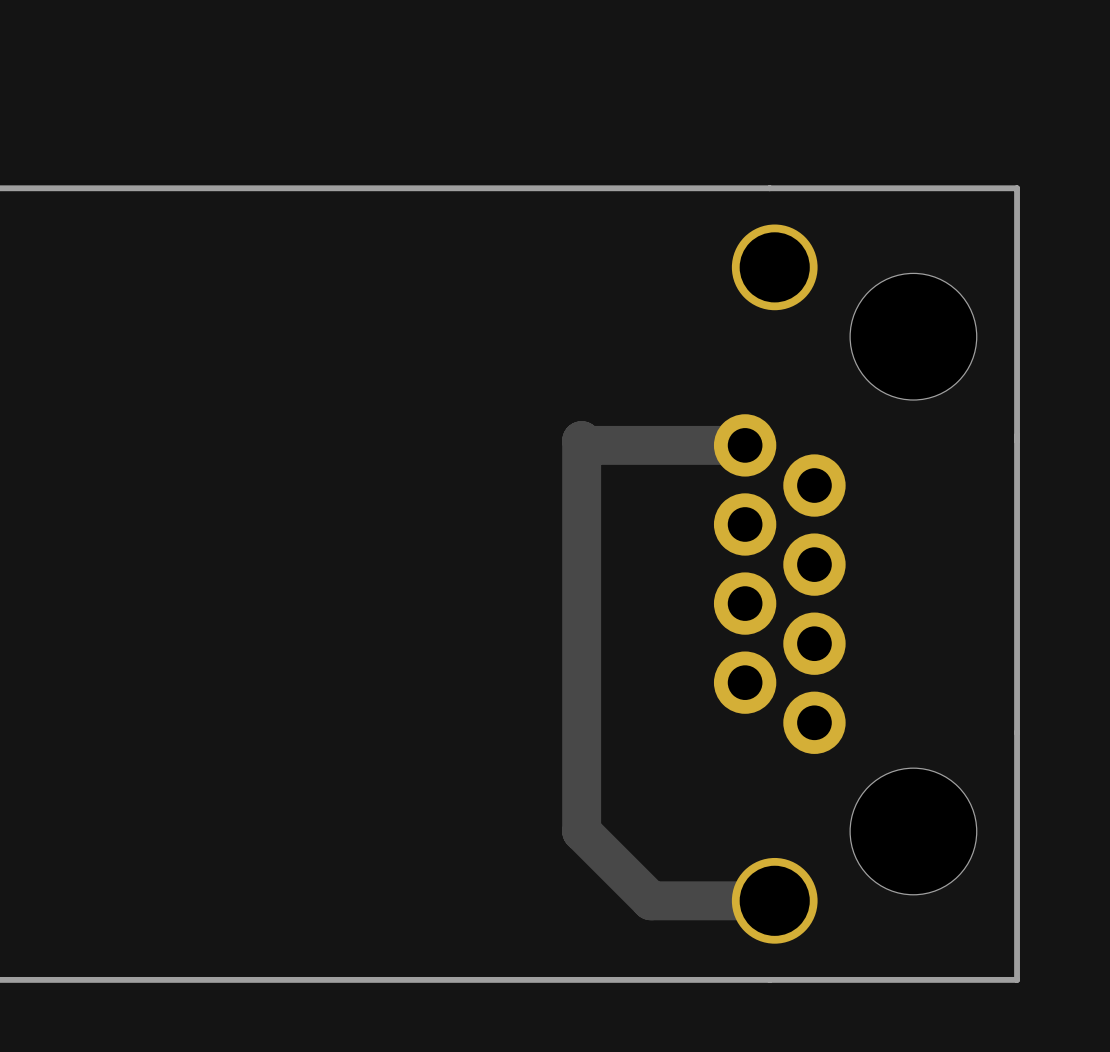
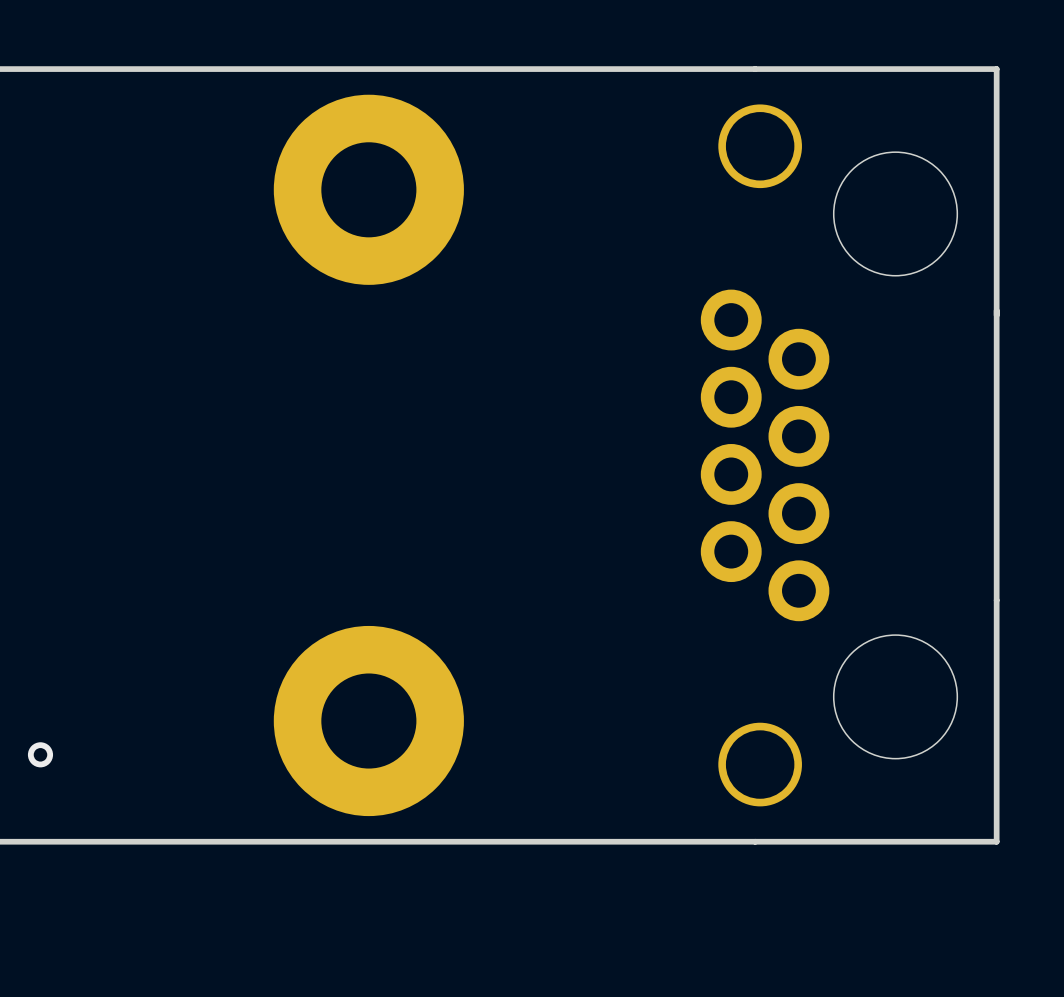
part: none -> (368, 189)
track: (745, 445) (586, 445) (581, 440) (581, 831) (651, 900) (774, 900) -> none
part: none -> (368, 721)
via: none -> (40, 754)

